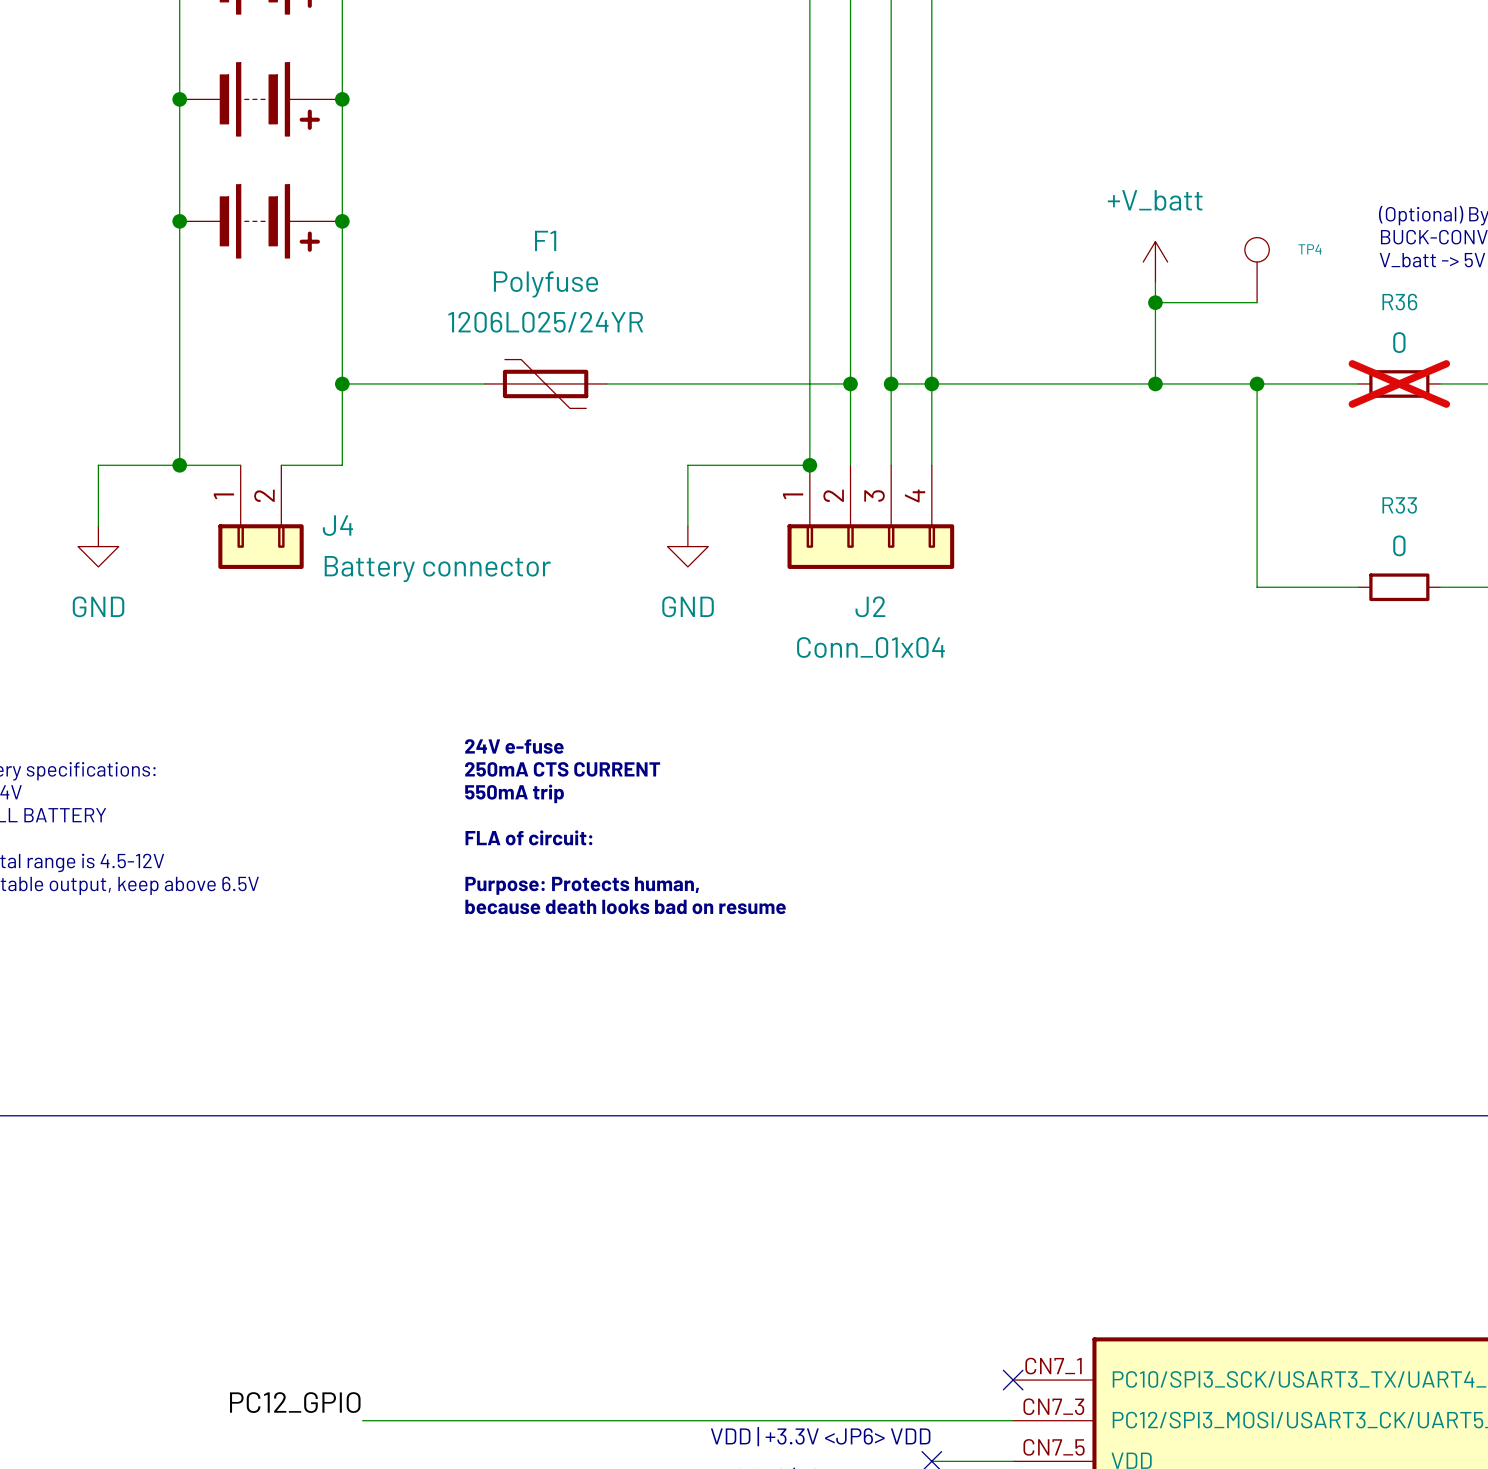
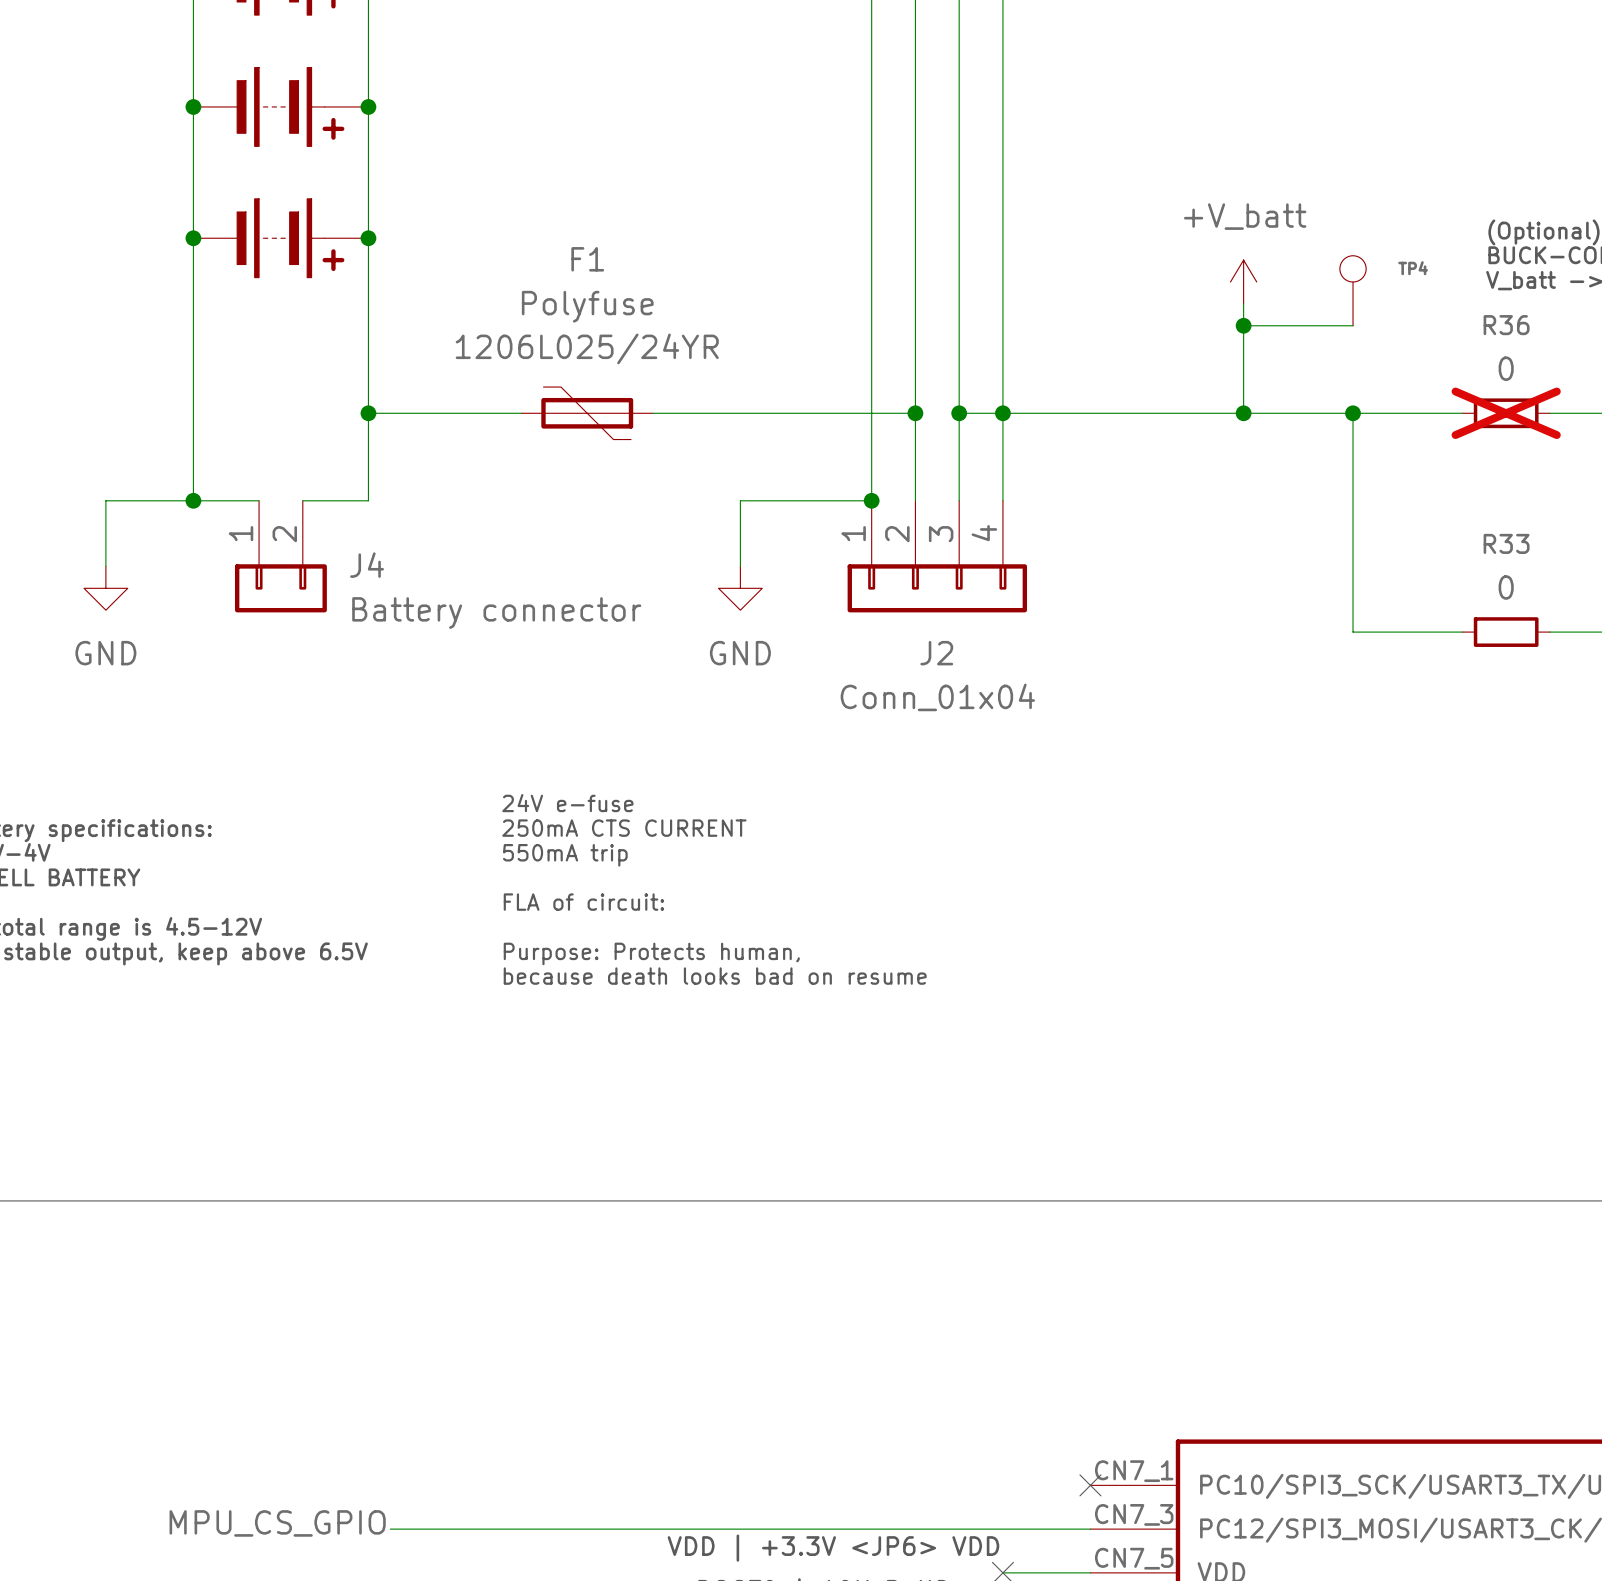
label: PC12_GPIO (295, 1402) -> MPU_CS_GPIO (277, 1523)

